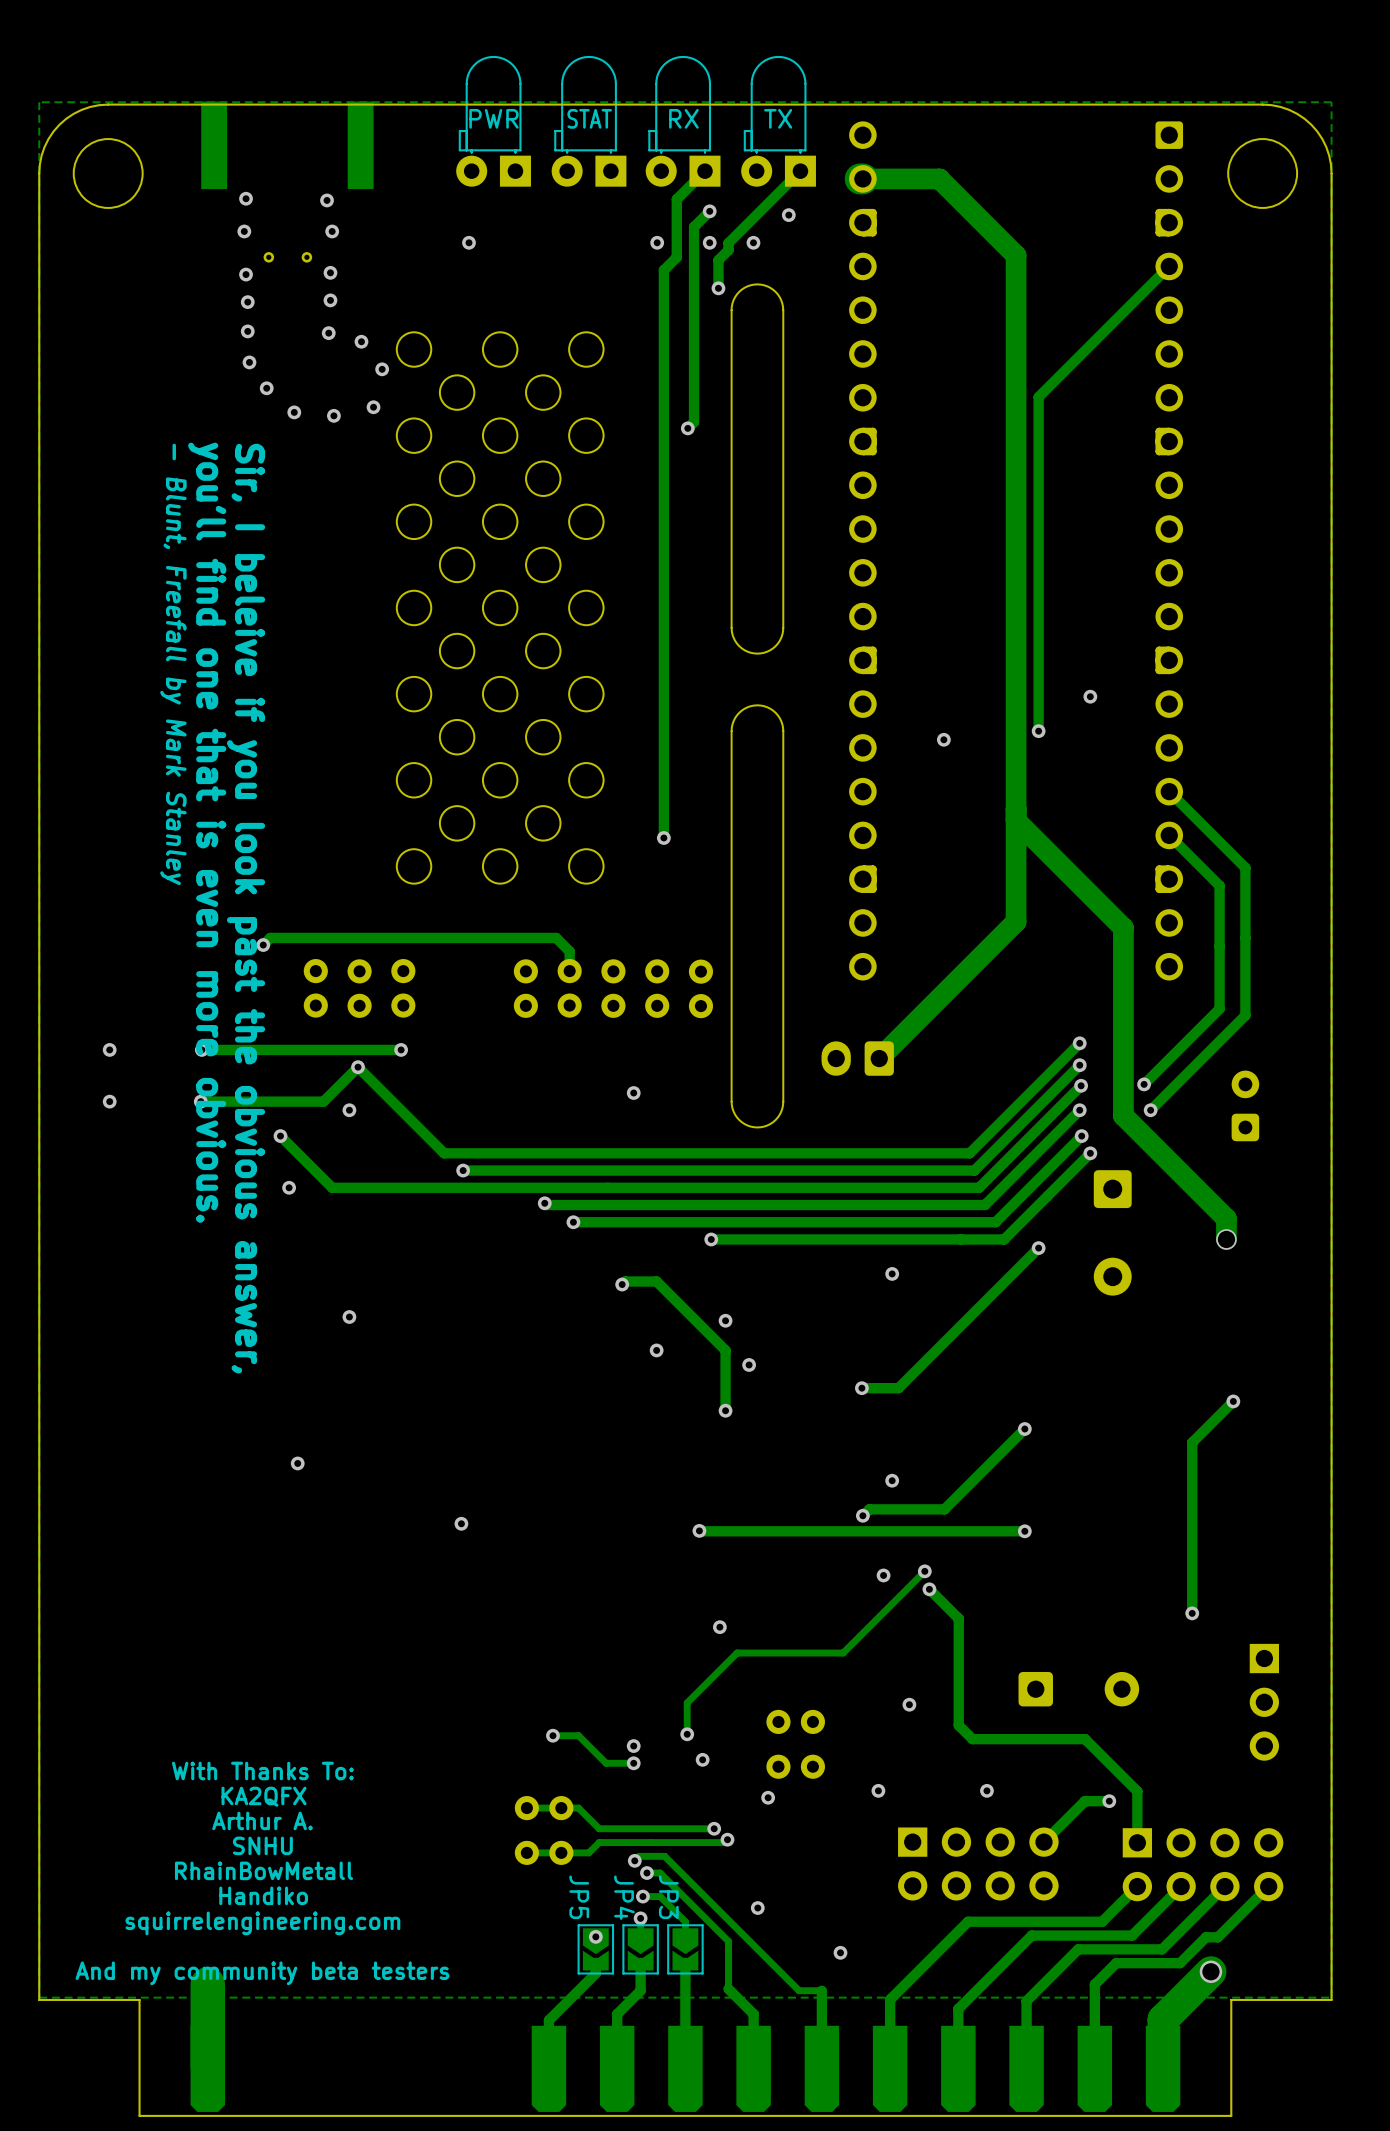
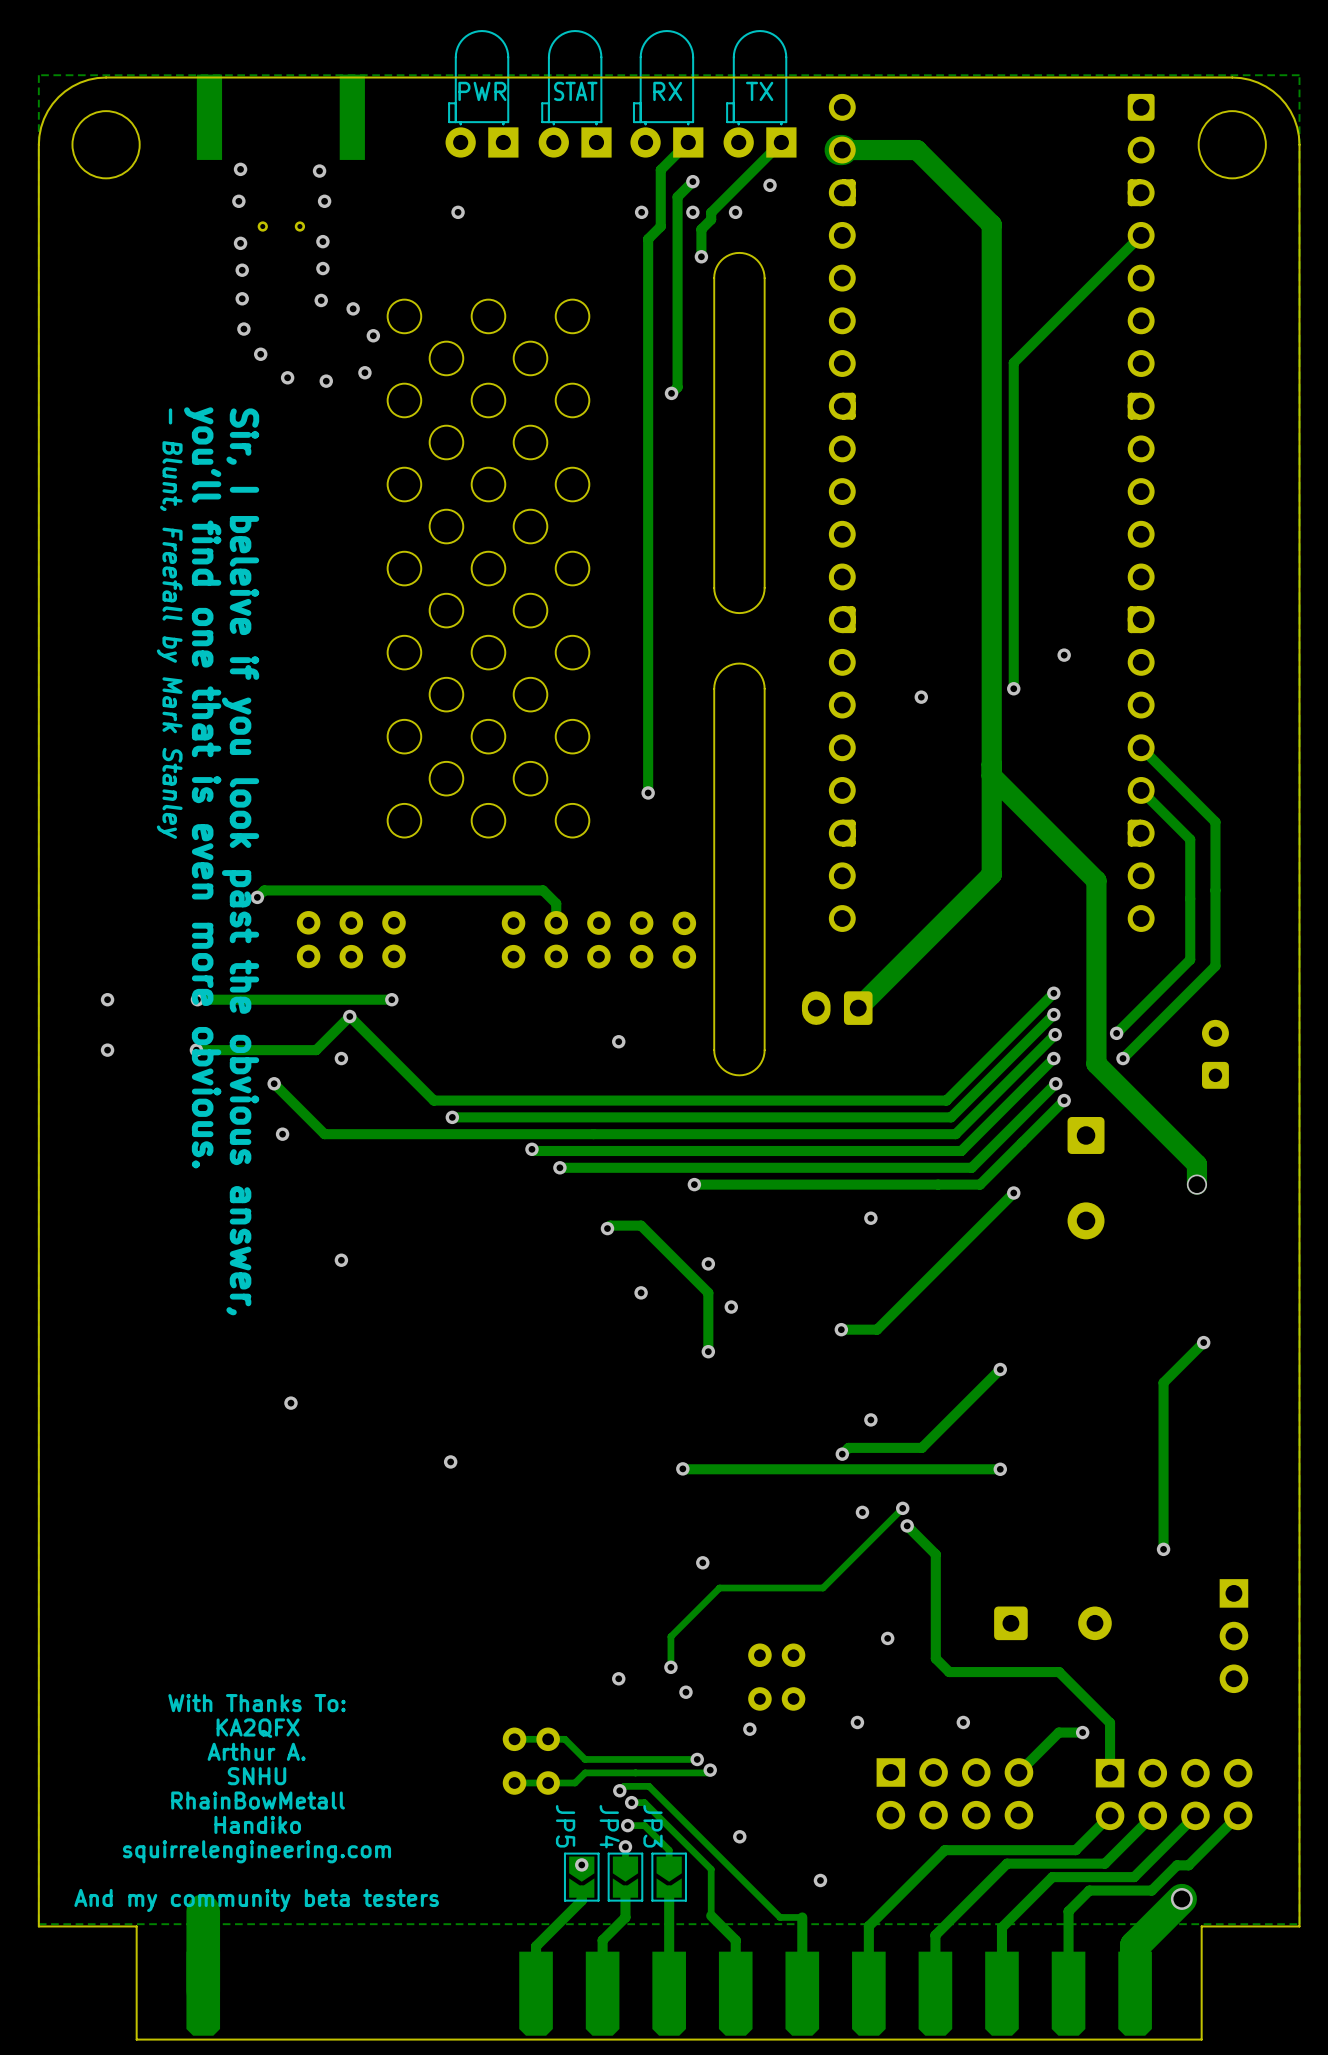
track: (552, 1735) (578, 1735) (606, 1763) (633, 1763) -> none
via: (552, 1735) -> none
via: (633, 1763) -> none

